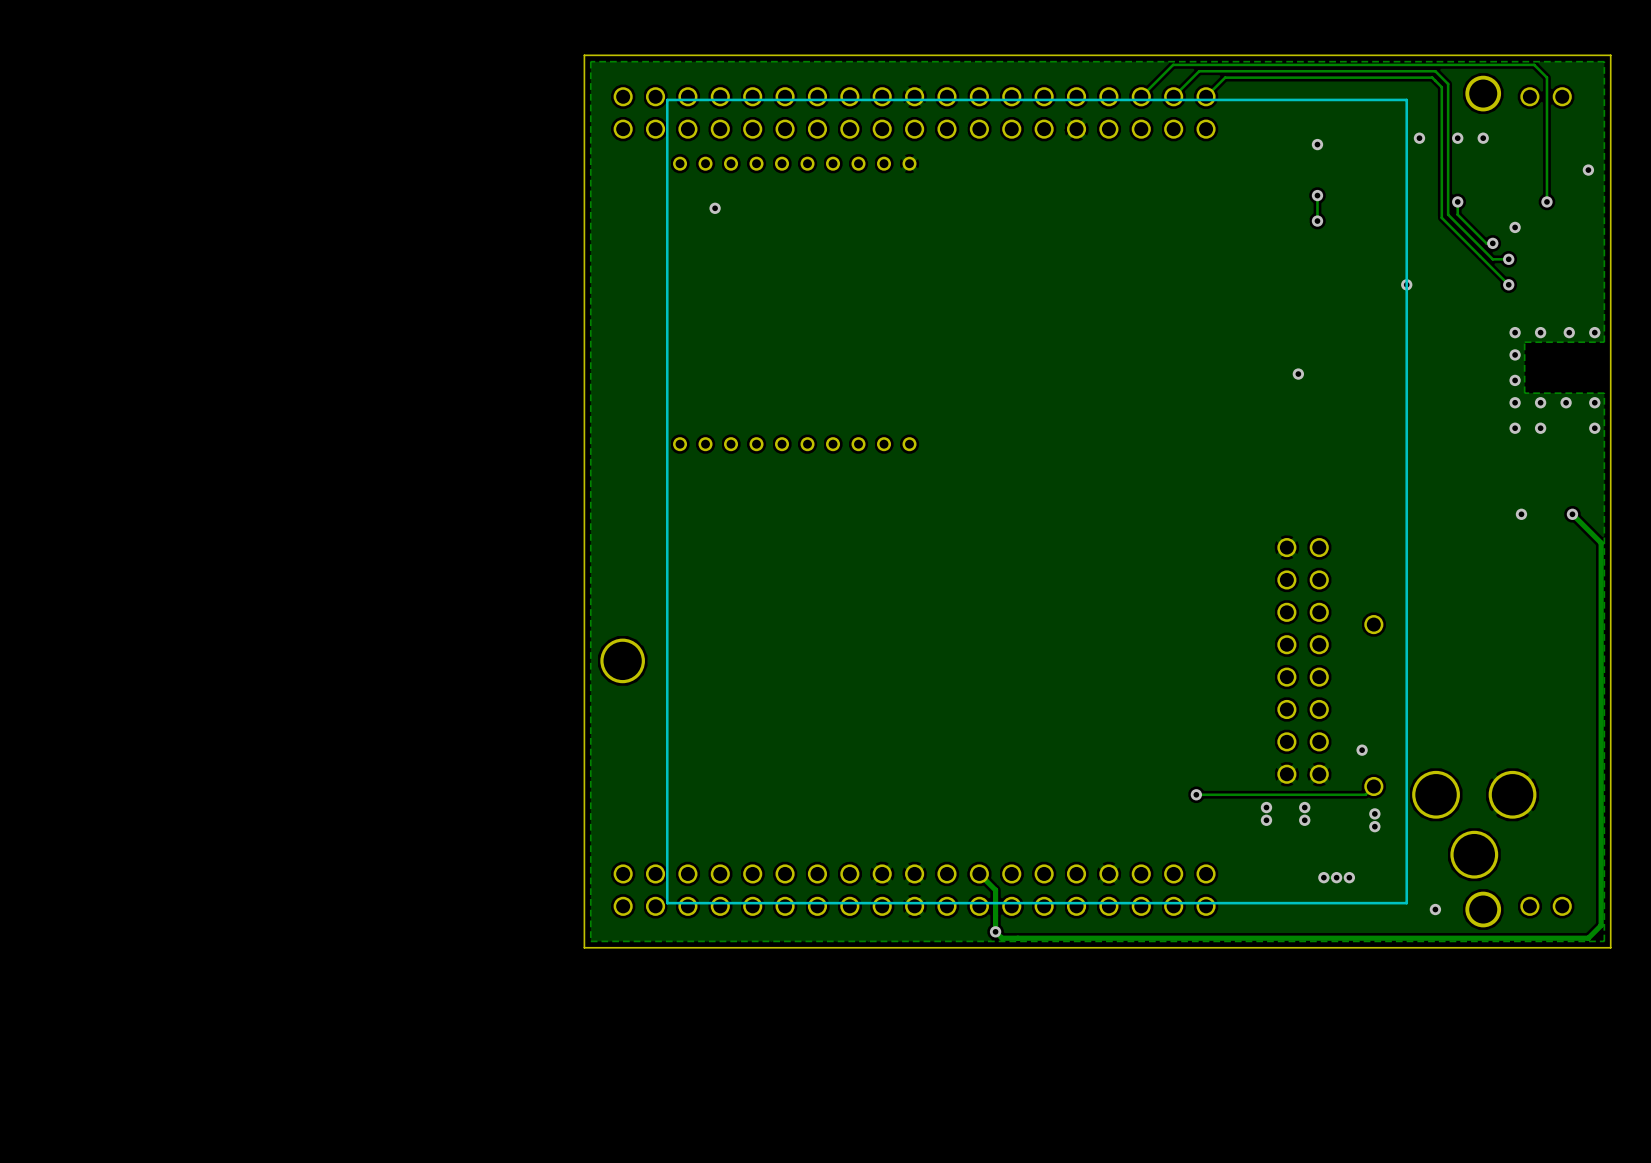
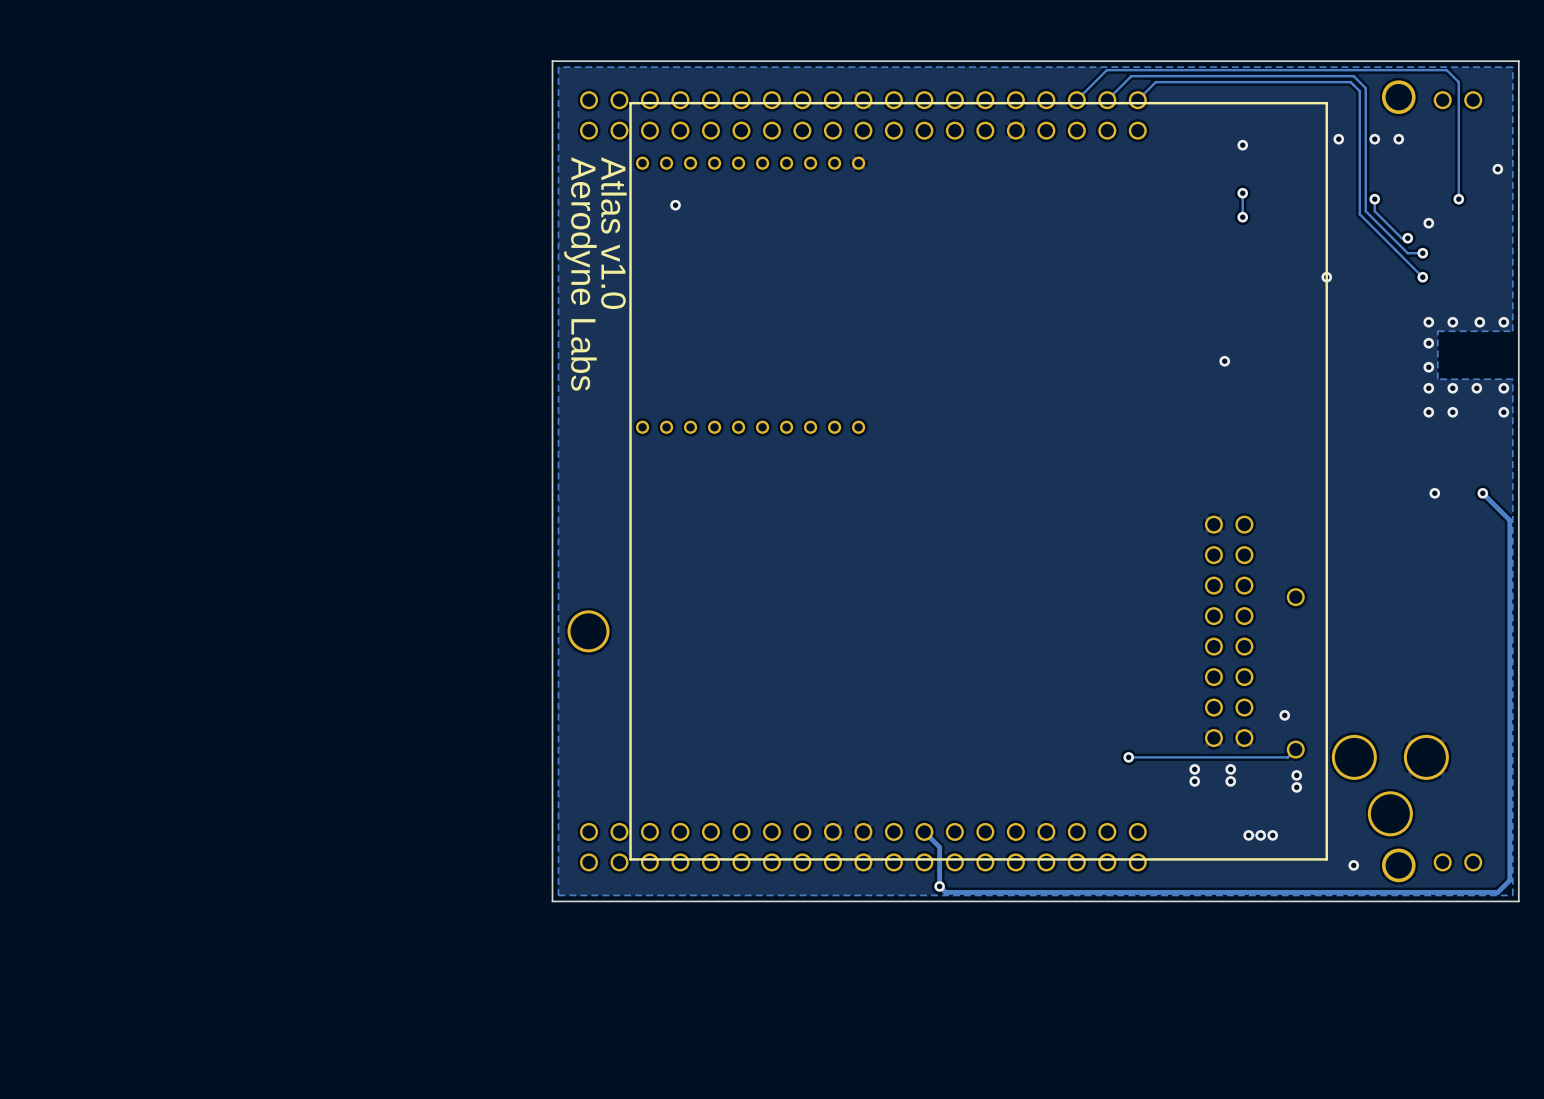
text: none -> Atlas v1.0 (613, 233)
text: none -> Aerodyne Labs (580, 273)

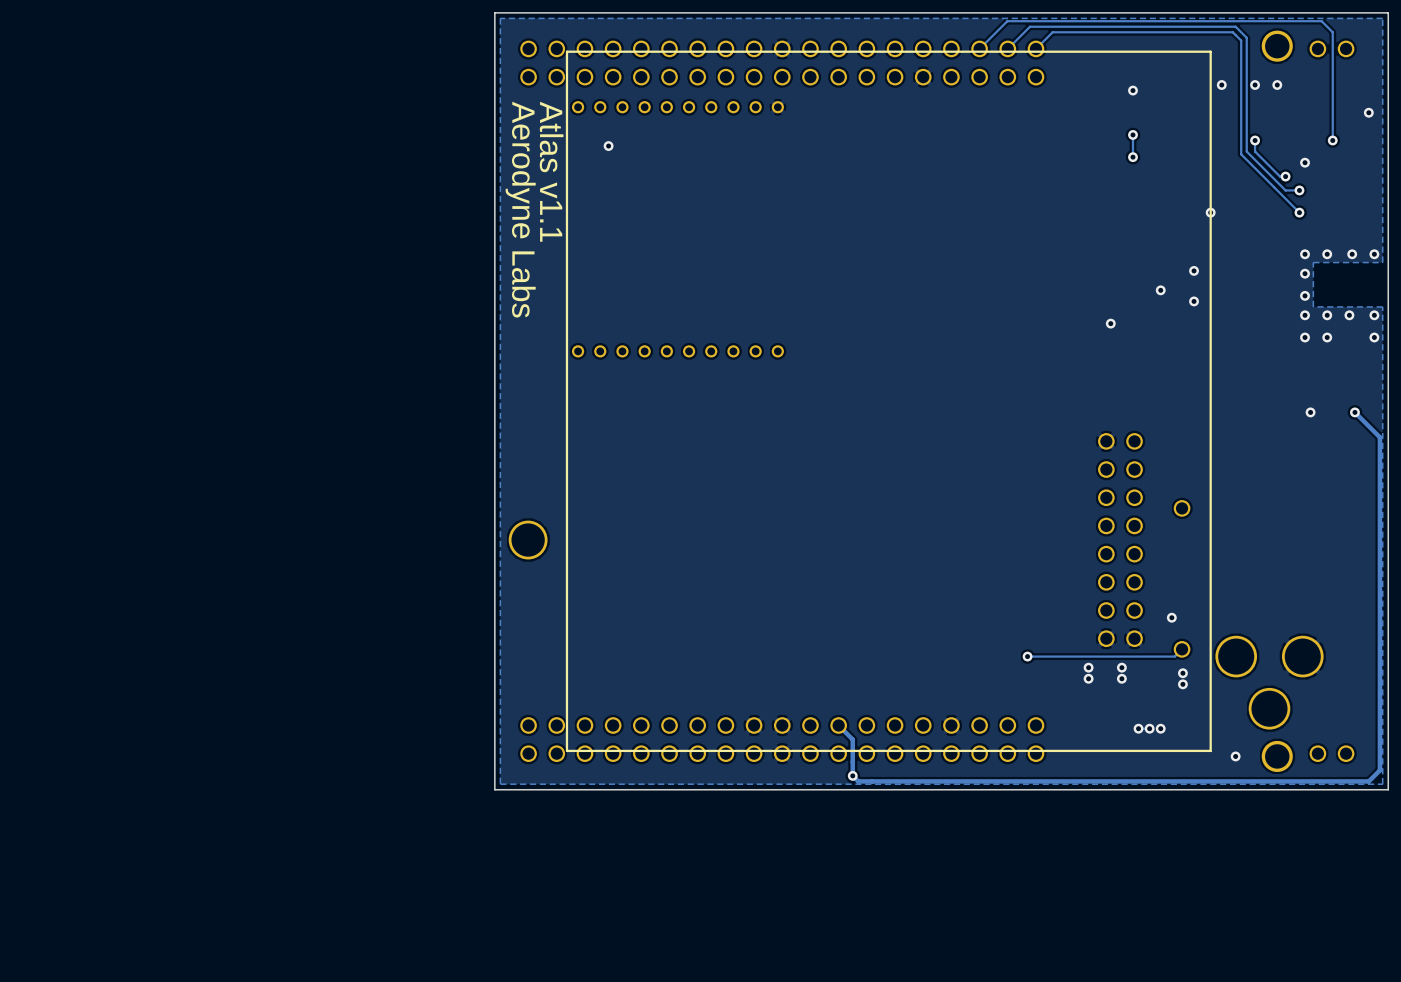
text: Atlas v1.0 (613, 233) -> Atlas v1.1 (551, 171)
via: none -> (1194, 270)
via: (1224, 361) -> none
via: none -> (1160, 290)
via: none -> (1194, 301)
via: none -> (1110, 323)

